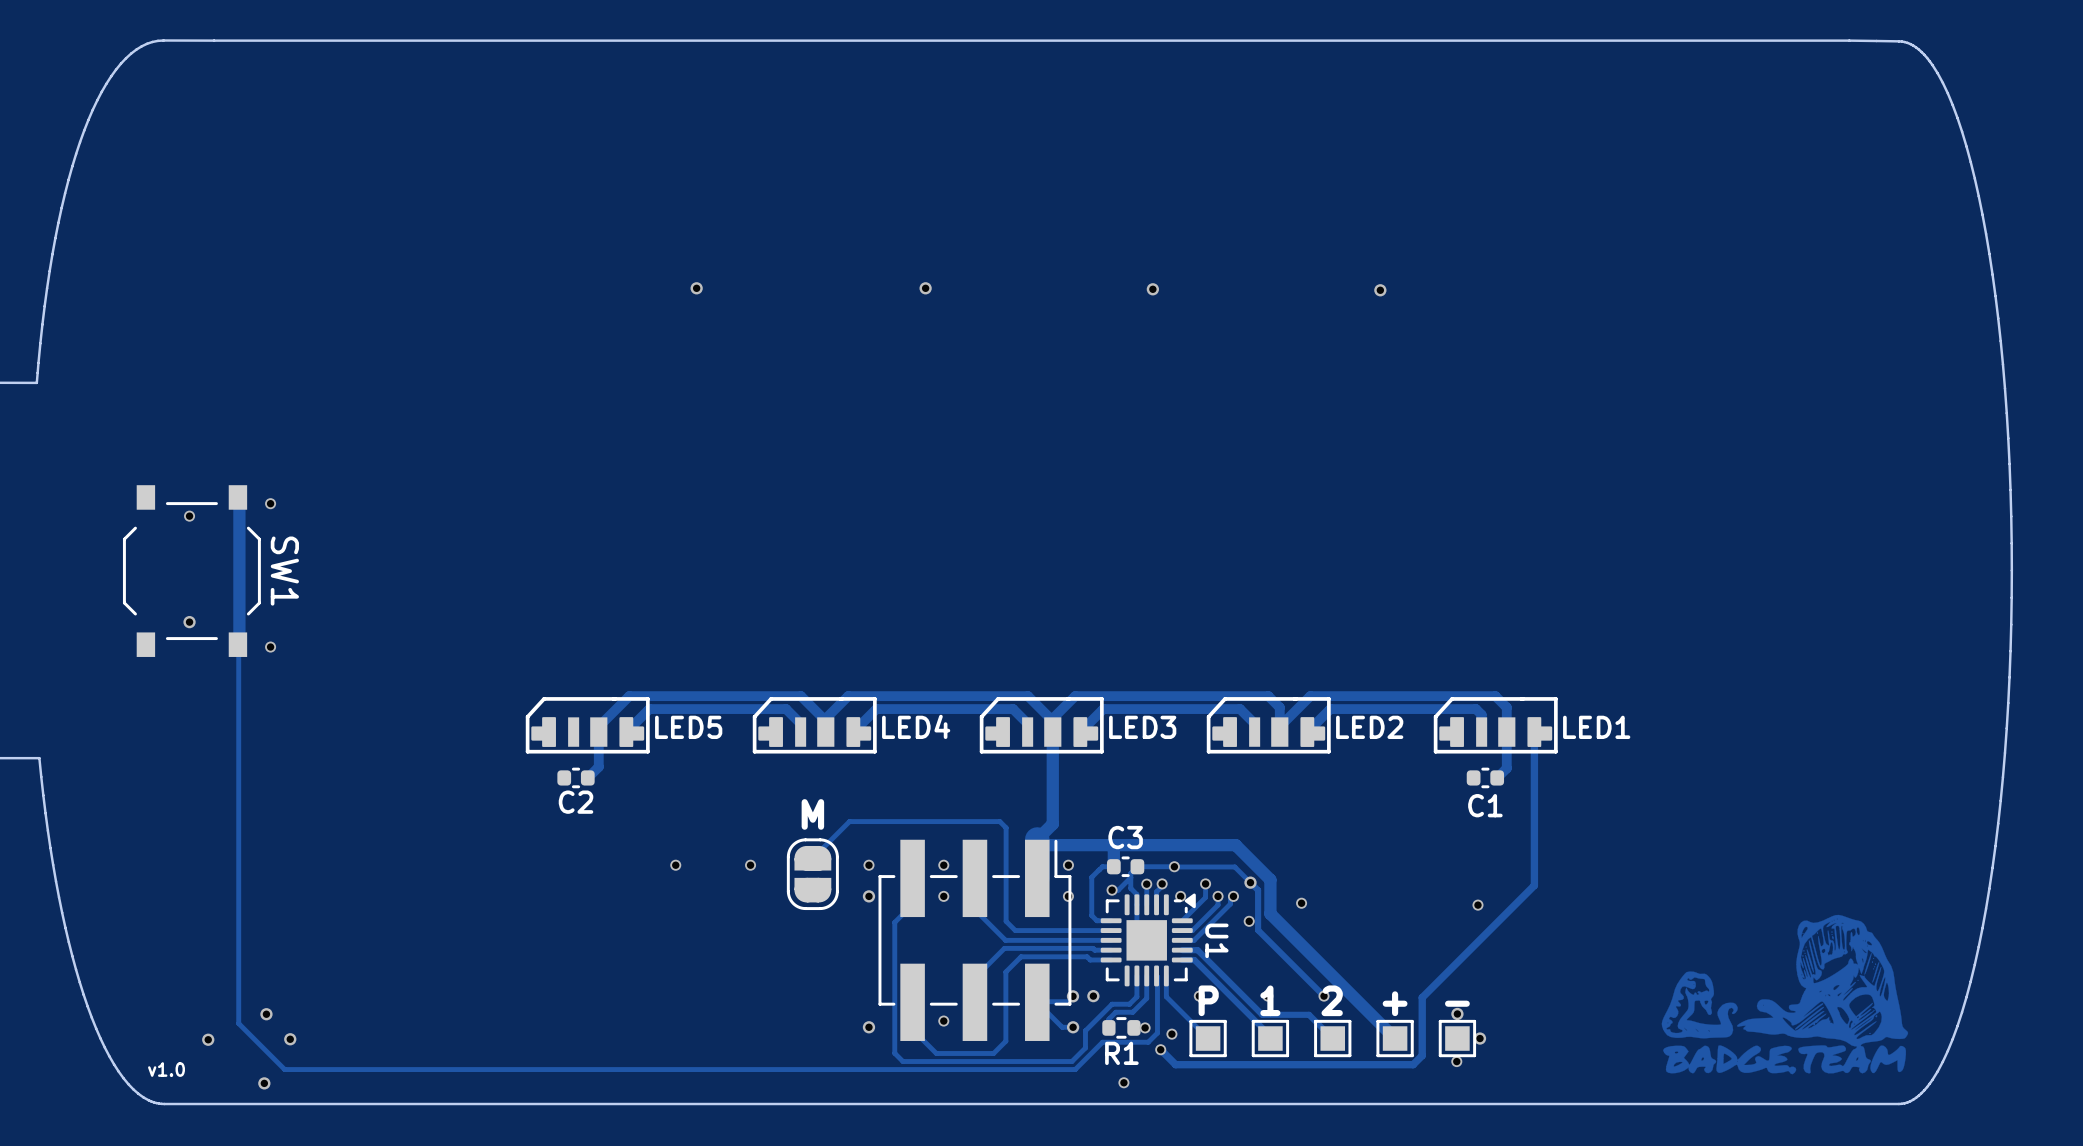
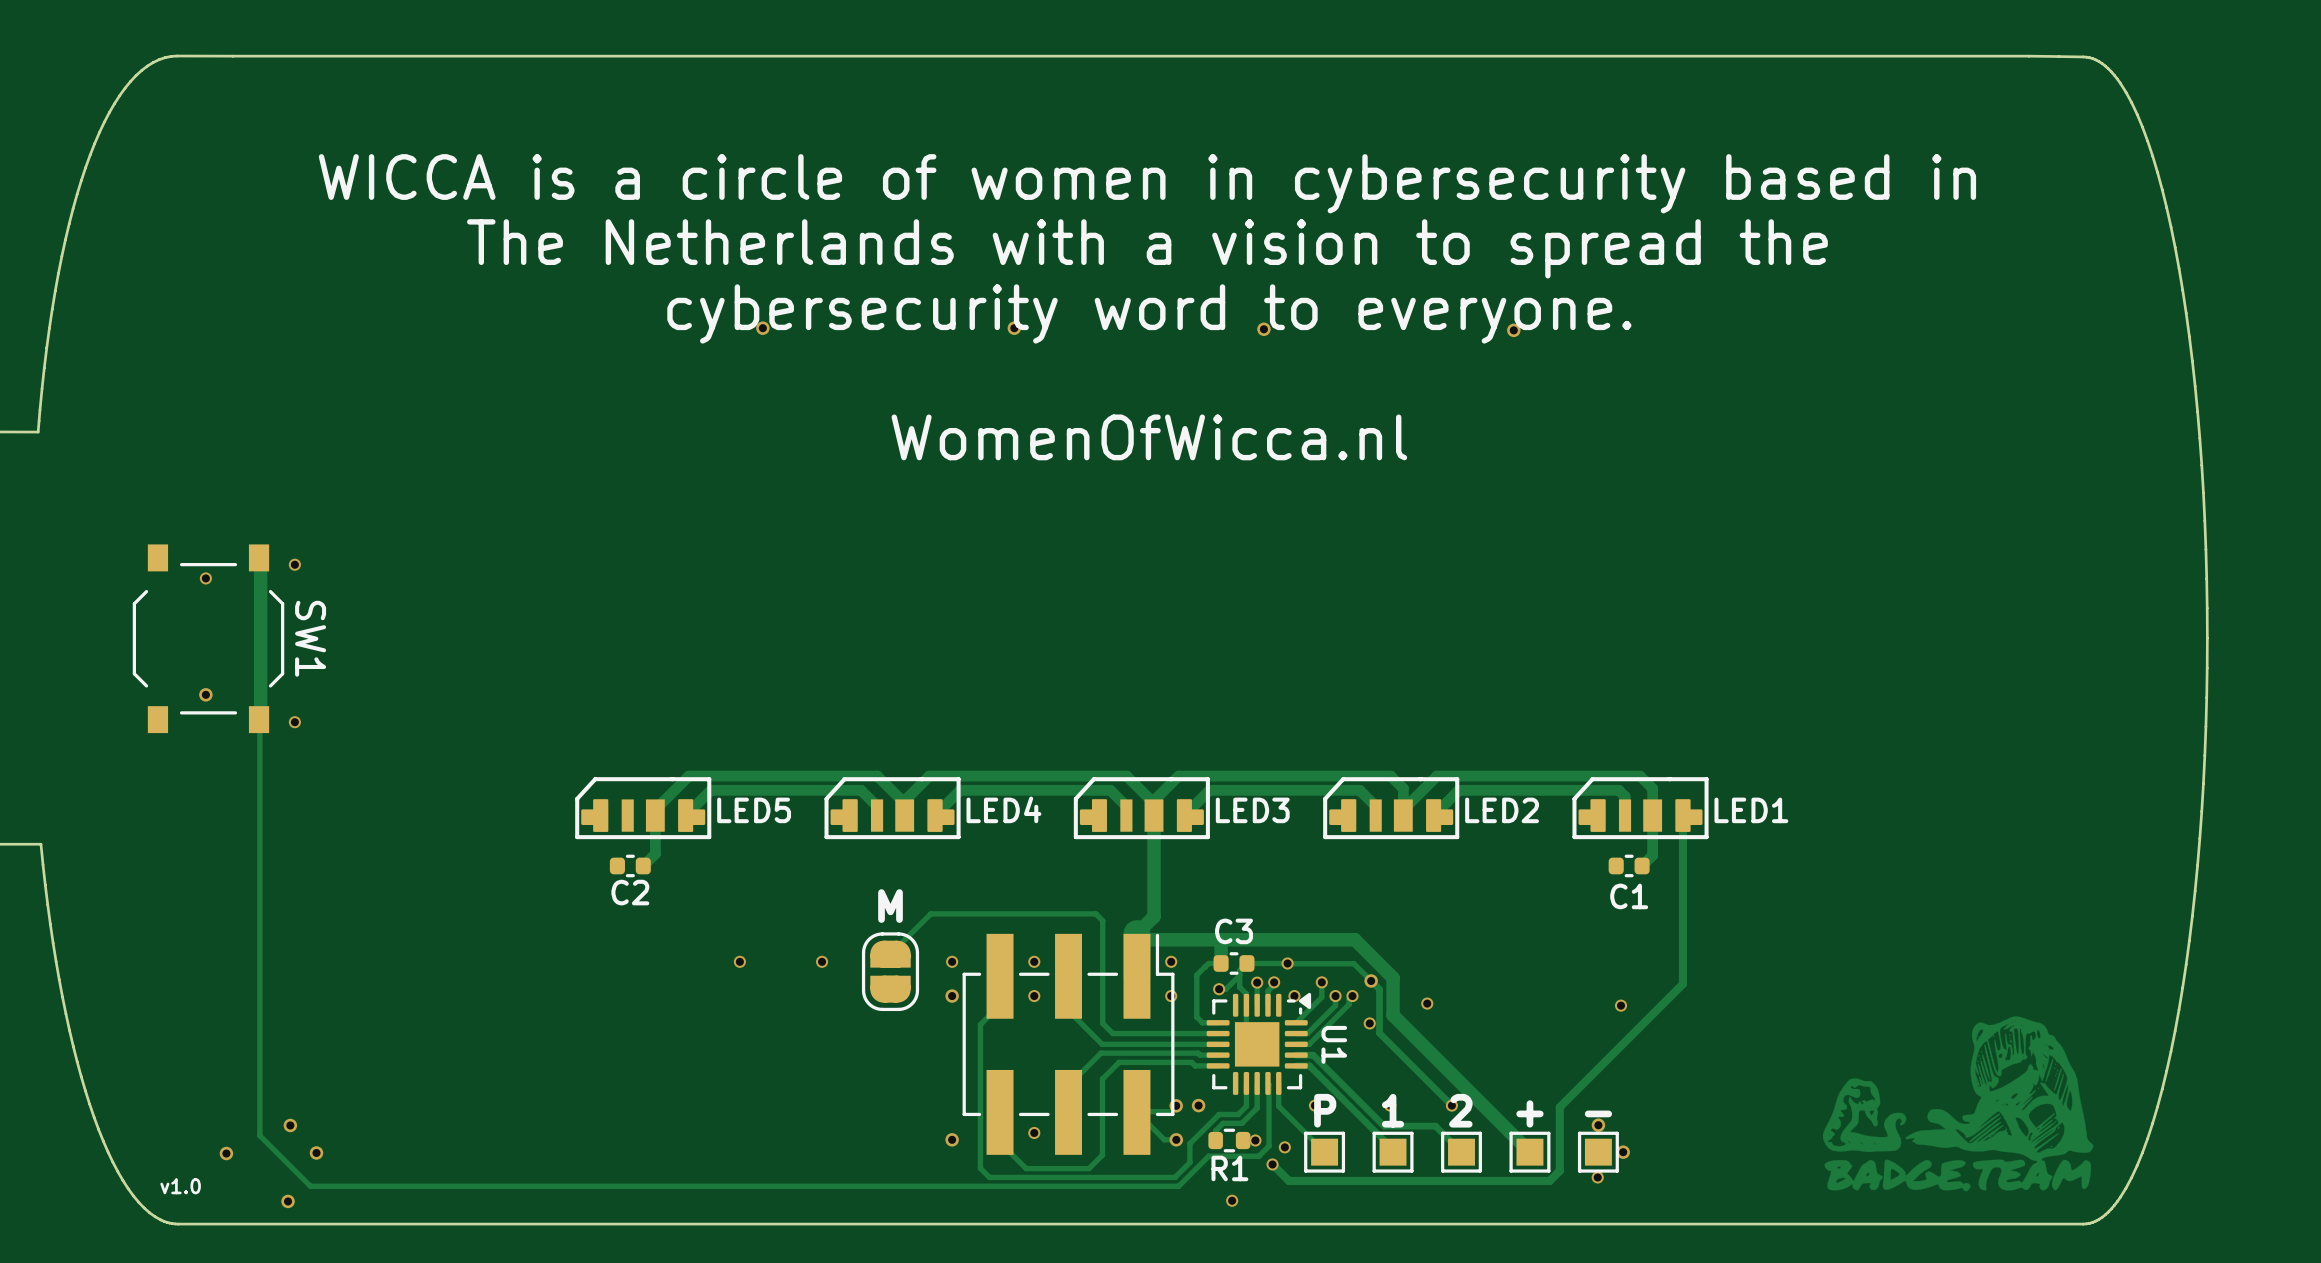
text: none -> WICCA is a circle of women in cybersecurity based in (1147, 183)
text: none -> The Netherlands with a vision to spread the (1147, 248)
text: none -> cybersecurity word to everyone. (1149, 313)
text: none -> WomenOfWicca.nl (1149, 437)

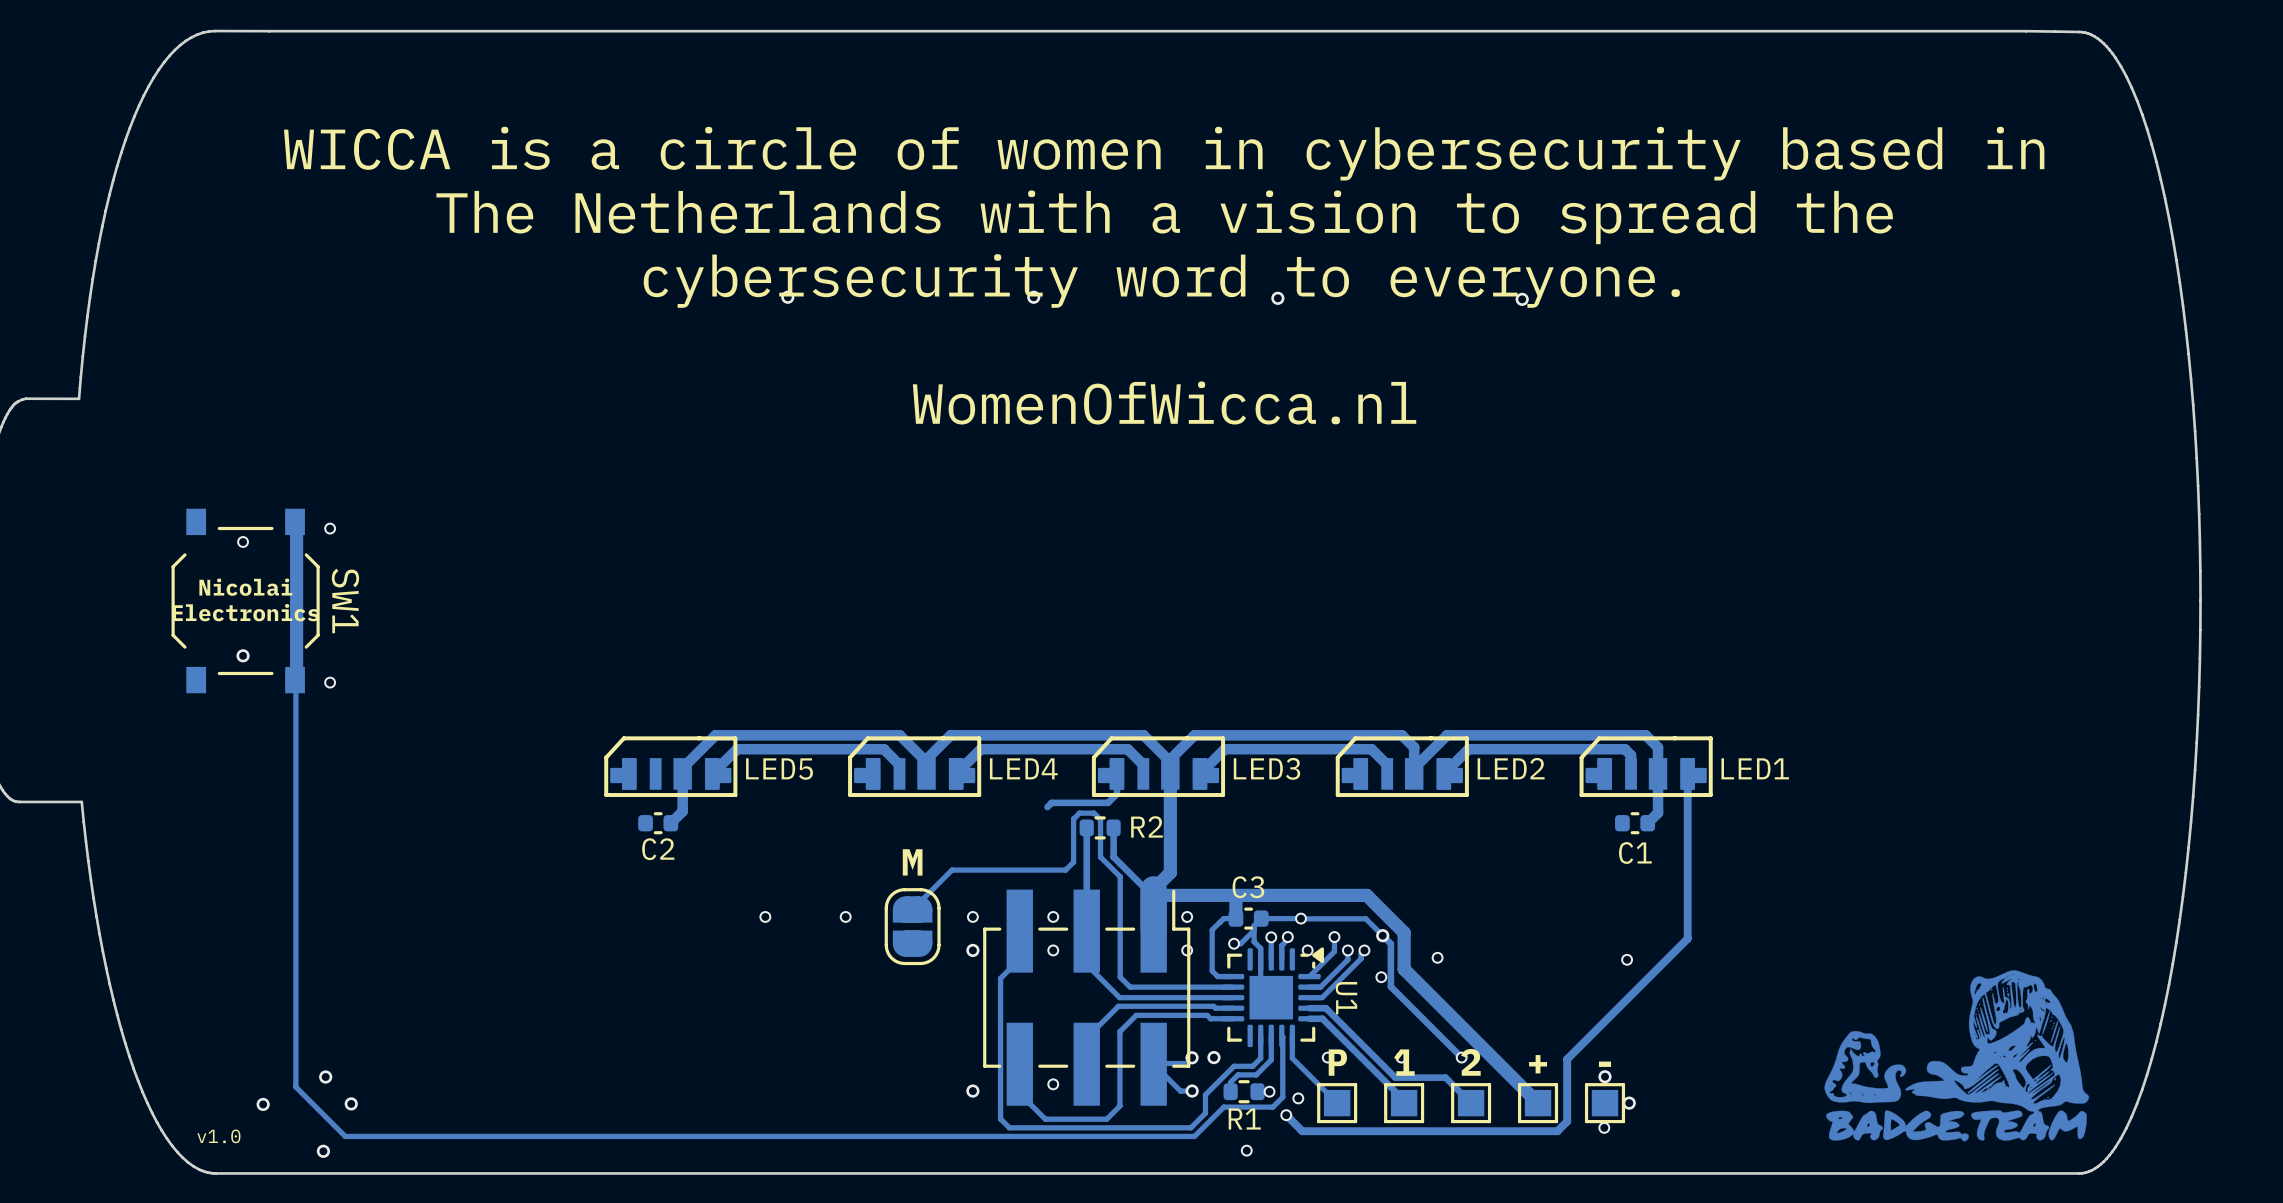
text: none -> Nicolai (245, 587)
text: none -> Electronics (245, 612)
track: none -> (1116, 773) (1116, 793) (1108, 802) (1051, 802) (1047, 807)
track: none -> (1086, 827) (1086, 931)
R2: none -> (1100, 827)
track: none -> (1113, 827) (1113, 857) (1153, 897) (1153, 931)
track: (1095, 913) (1046, 913) -> (1113, 870) (1100, 857) (1100, 819) (1094, 813) (1079, 813) (1073, 818) (1073, 862) (1065, 870)

